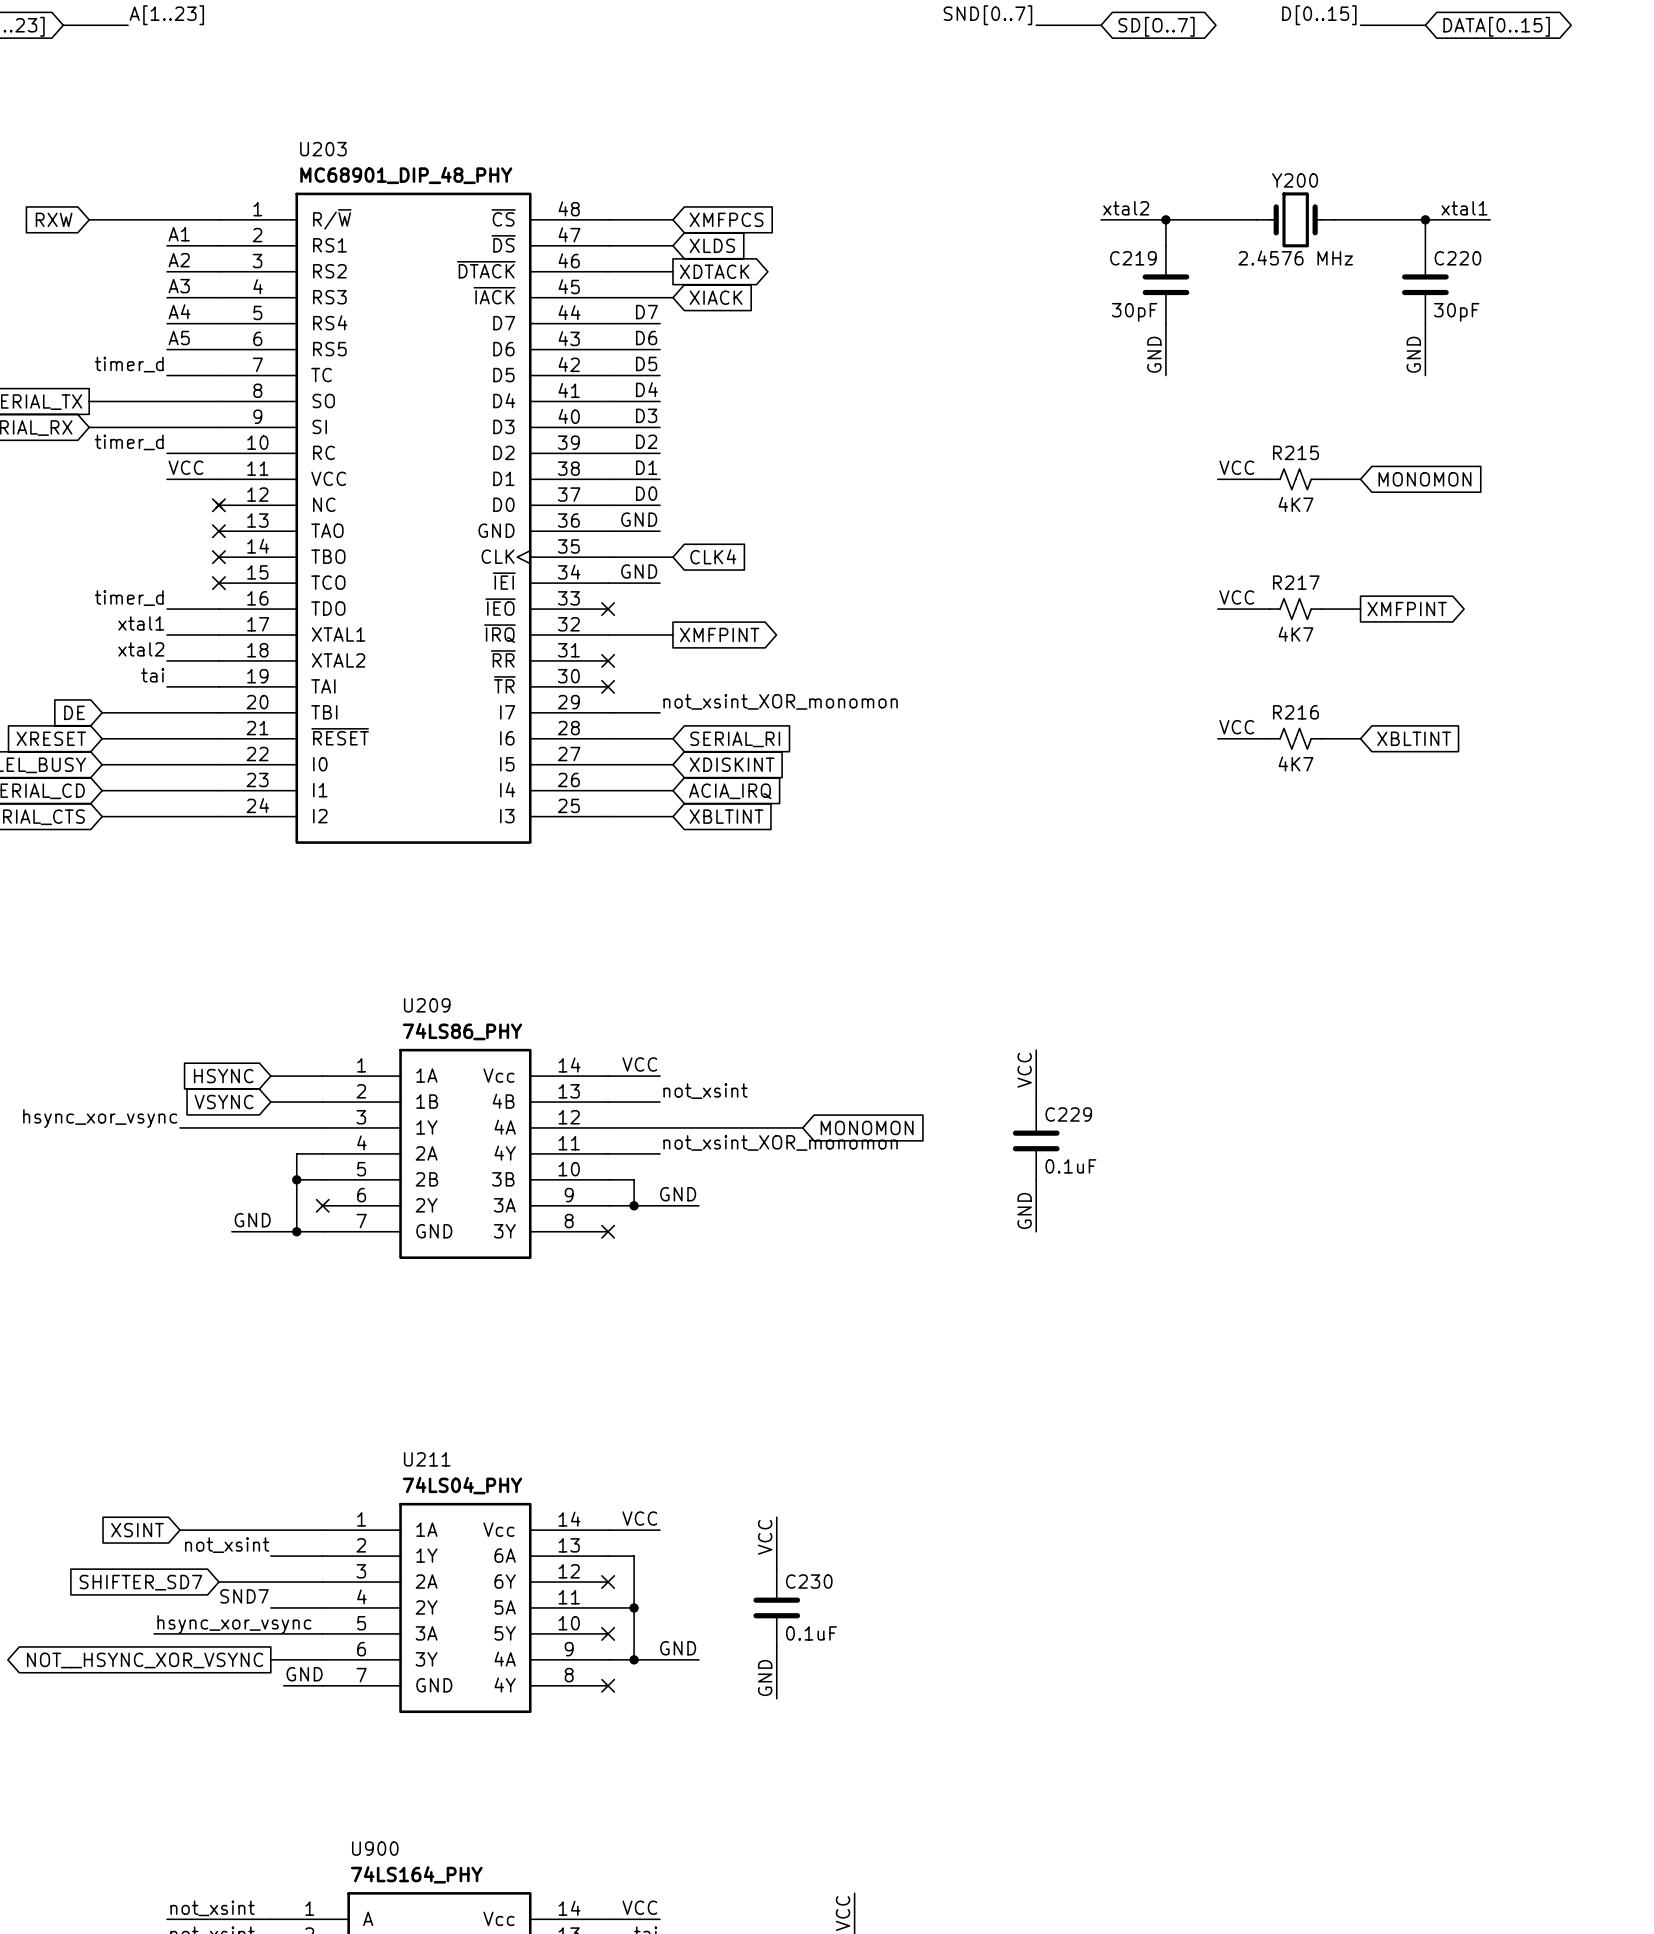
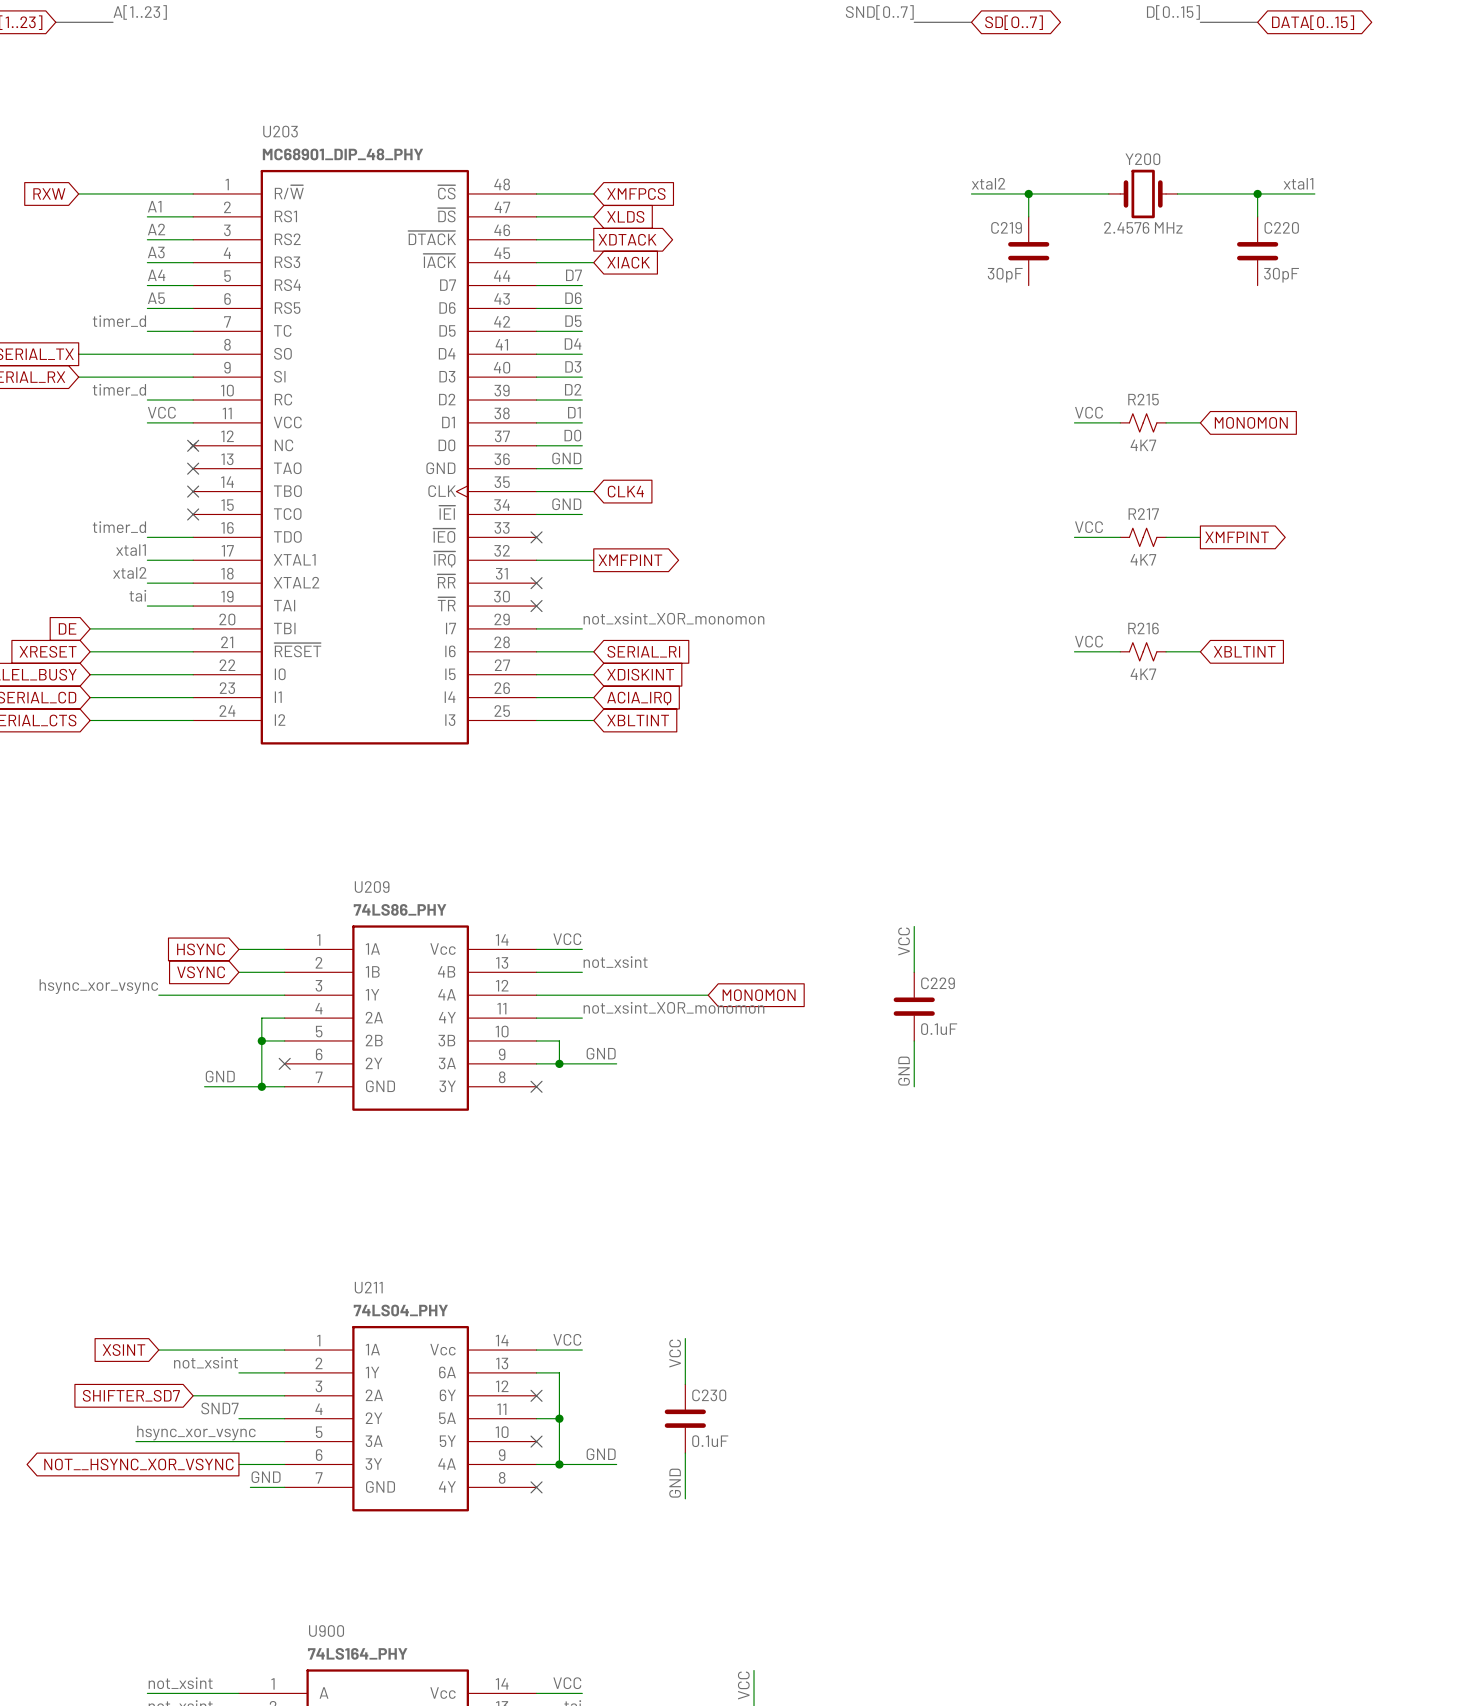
wire: (1165, 323) (1165, 375) -> none
wire: (1425, 323) (1425, 375) -> none
label: GND (1154, 354) -> none
label: GND (1413, 354) -> none

